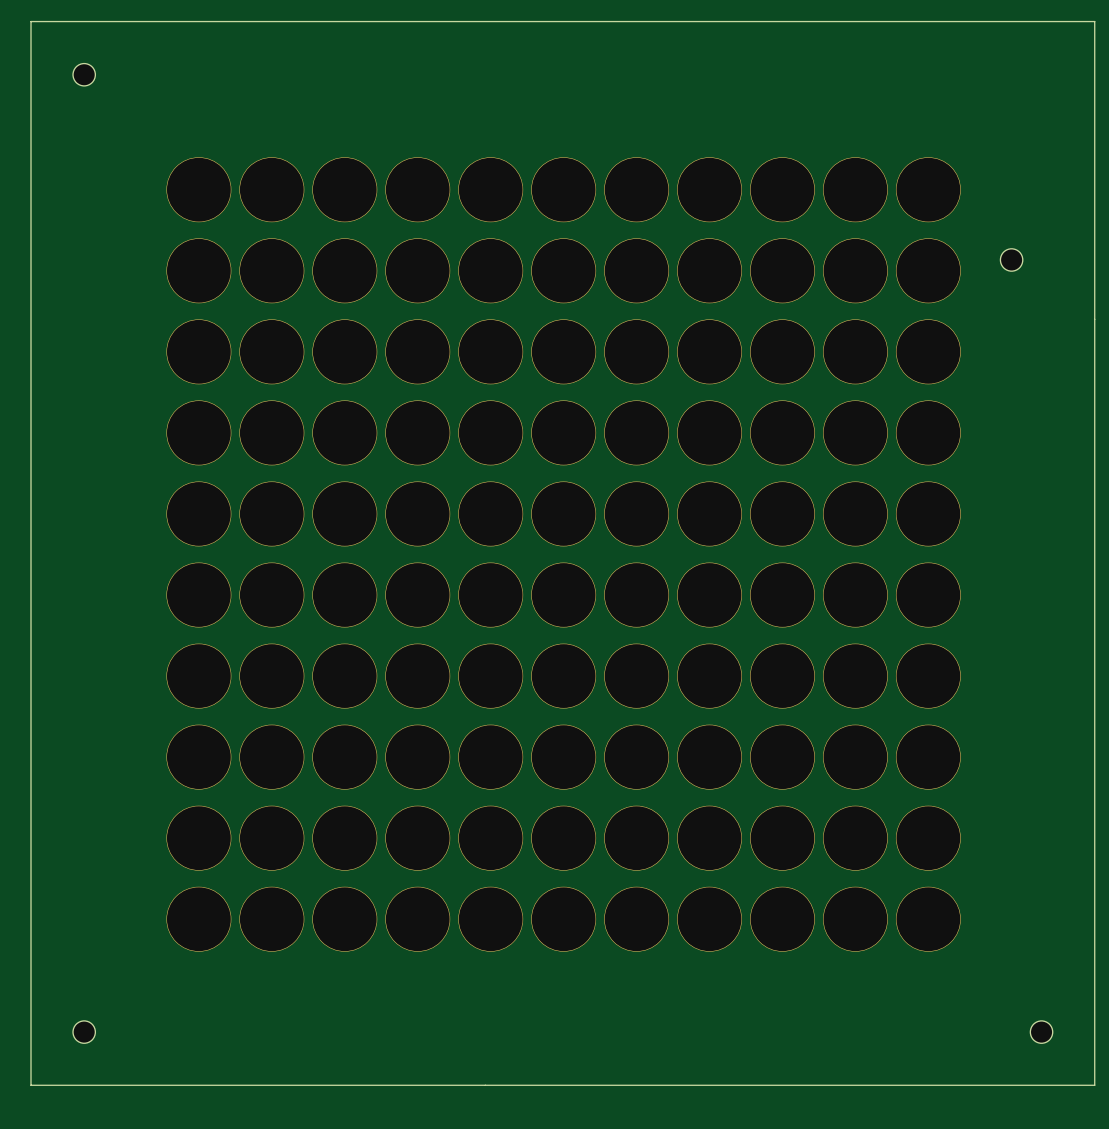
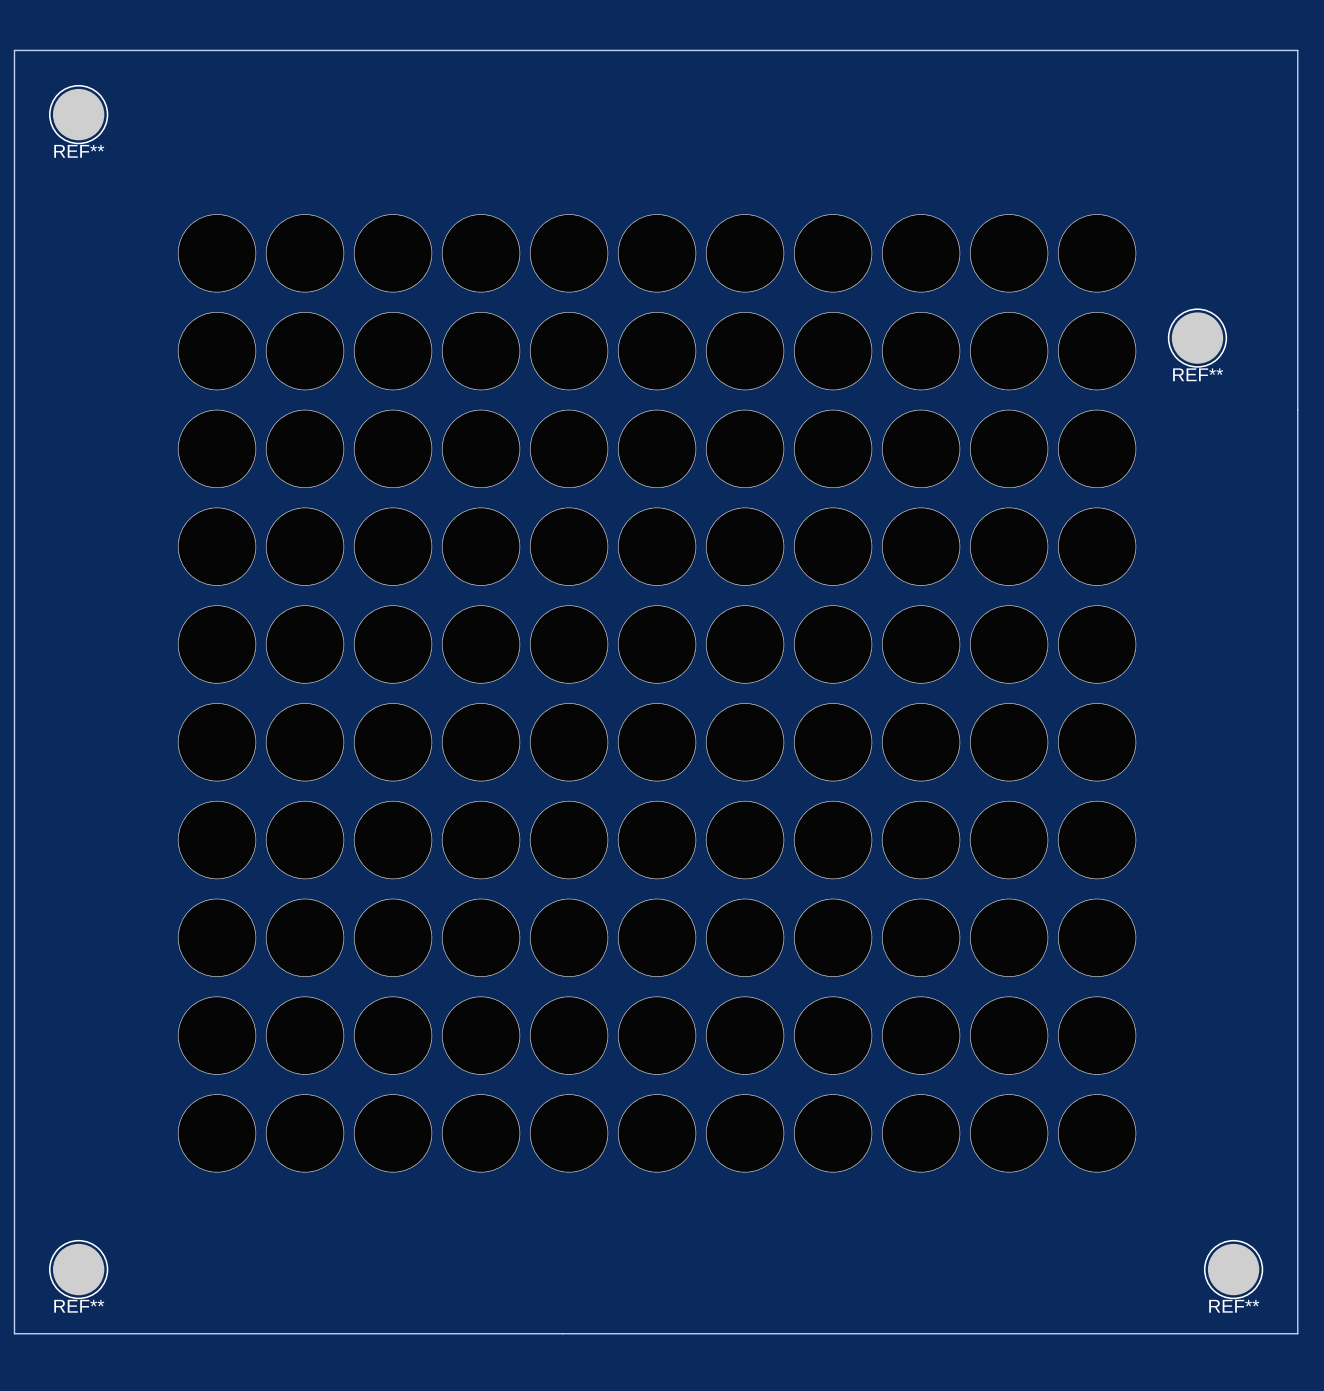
part: (84, 74) -> none
REF**: none -> (78, 114)
part: (1011, 259) -> none
REF**: none -> (1197, 338)
part: (84, 1032) -> none
REF**: none -> (78, 1269)
part: (1041, 1032) -> none
REF**: none -> (1233, 1269)

